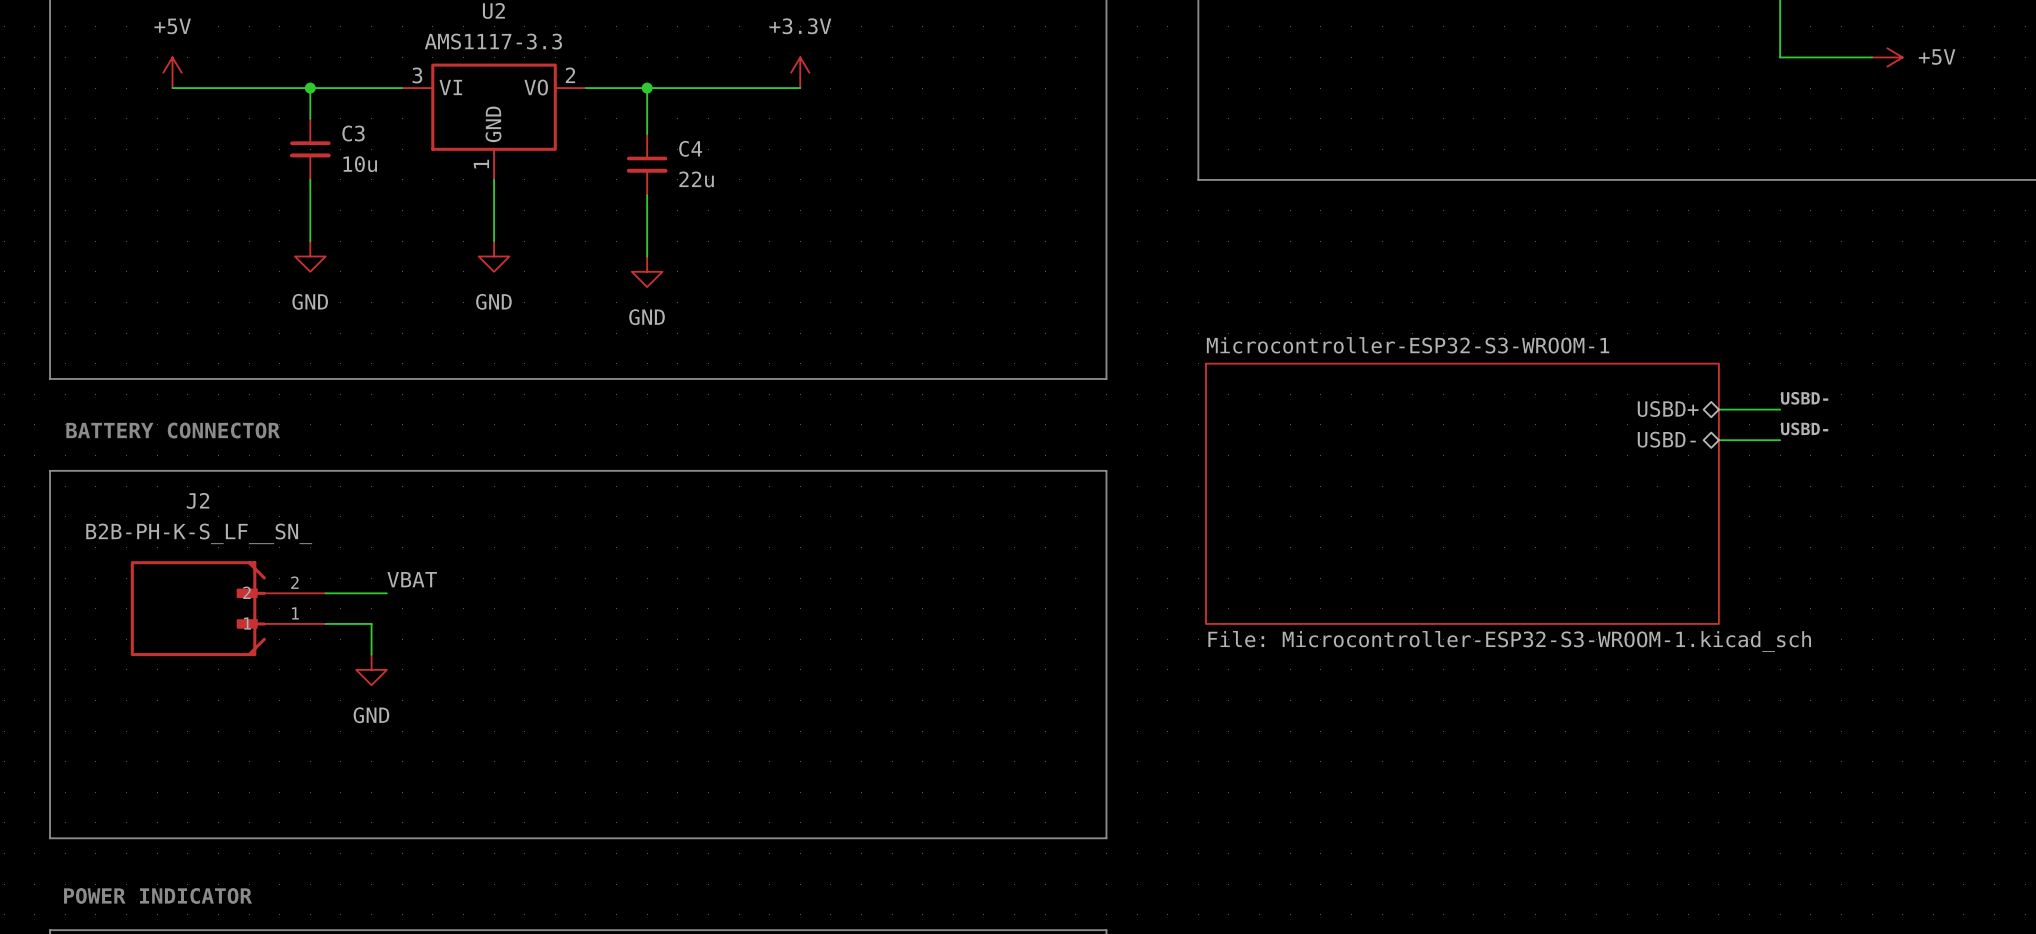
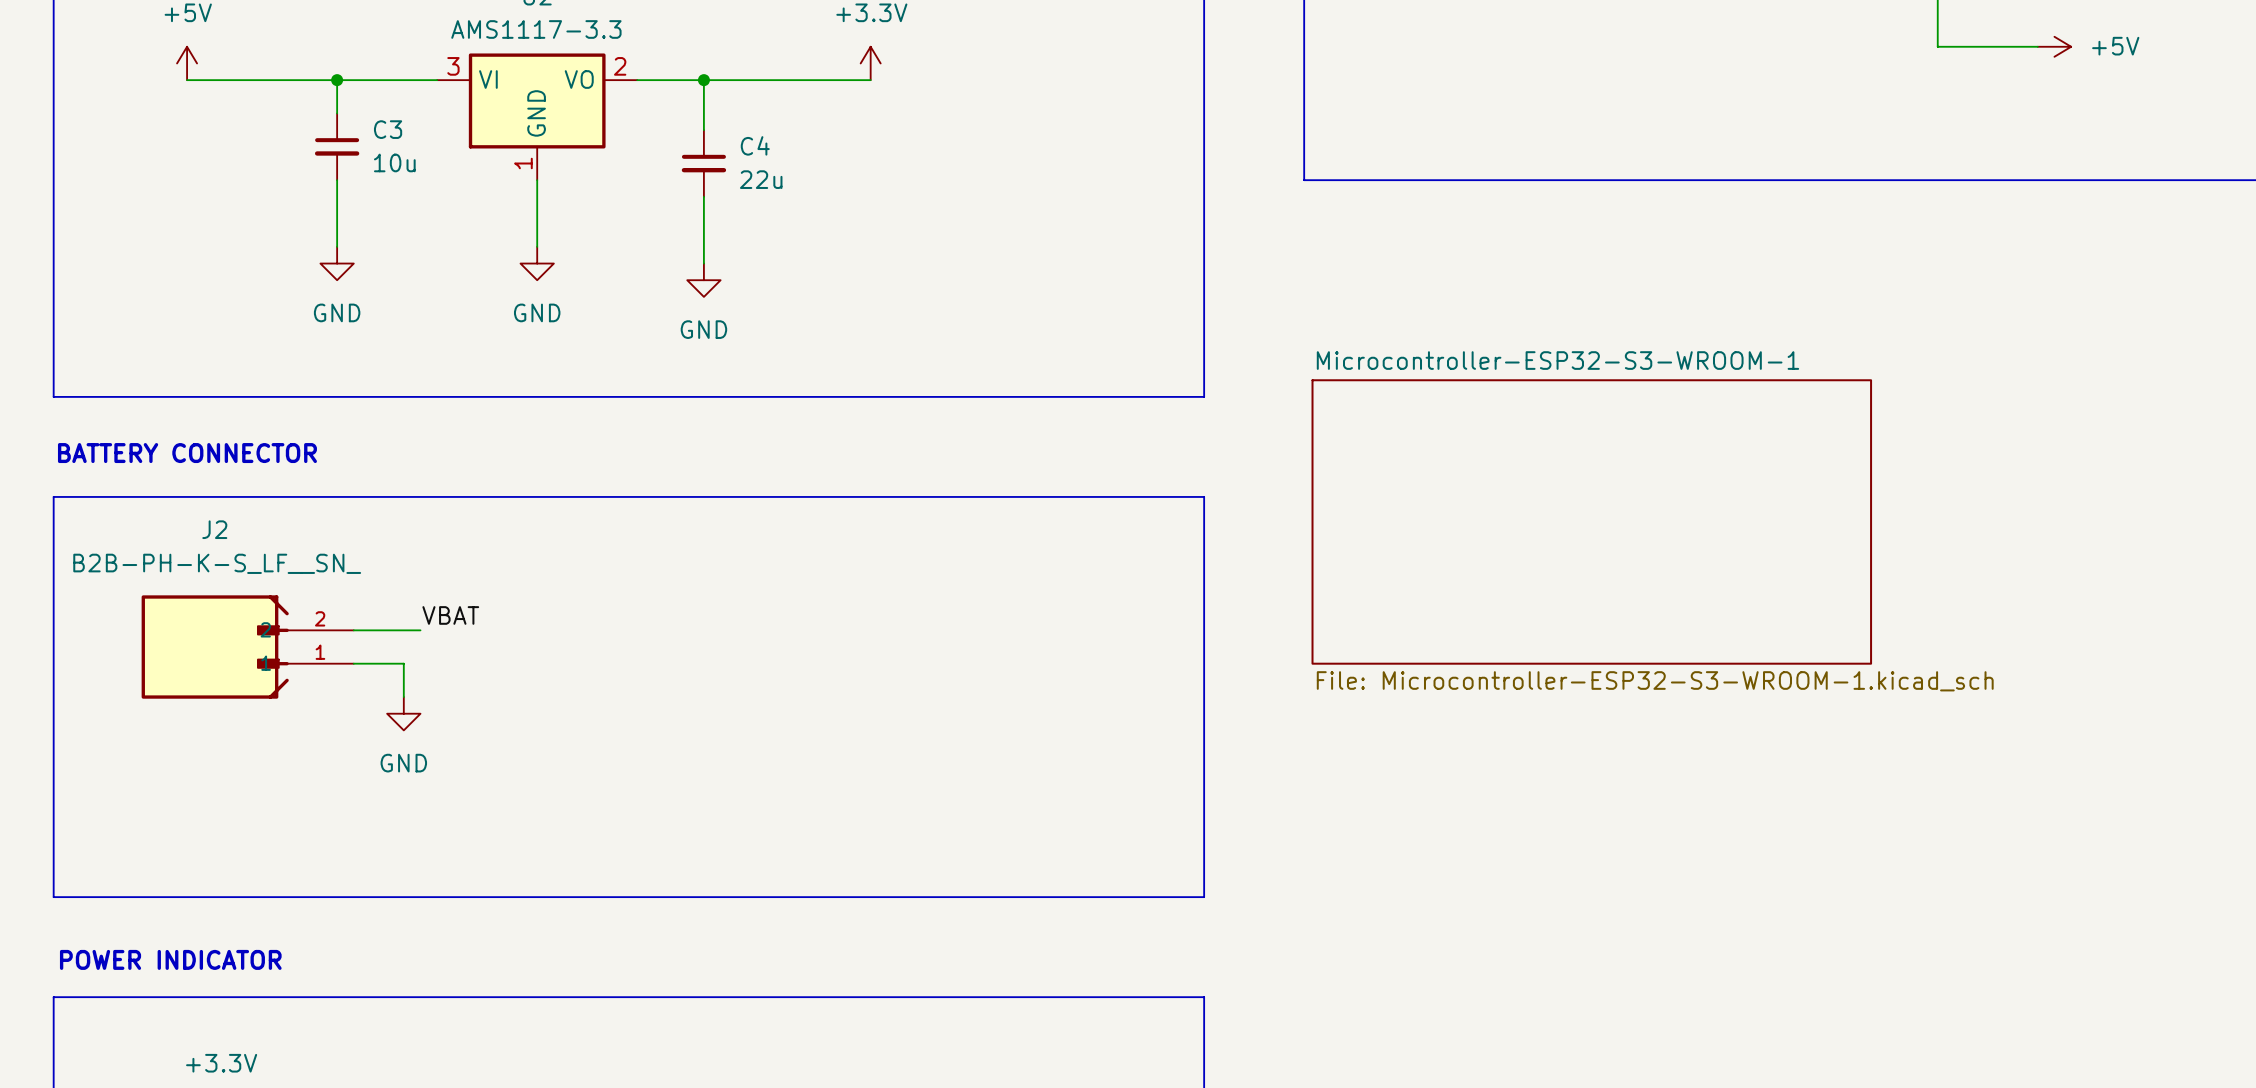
label: USBD- (1804, 398) -> none
sheet pin: USBD+ (1668, 409) -> none
wire: (1718, 409) (1780, 409) -> none
label: USBD- (1804, 428) -> none
sheet pin: USBD- (1666, 439) -> none
wire: (1718, 440) (1780, 440) -> none

